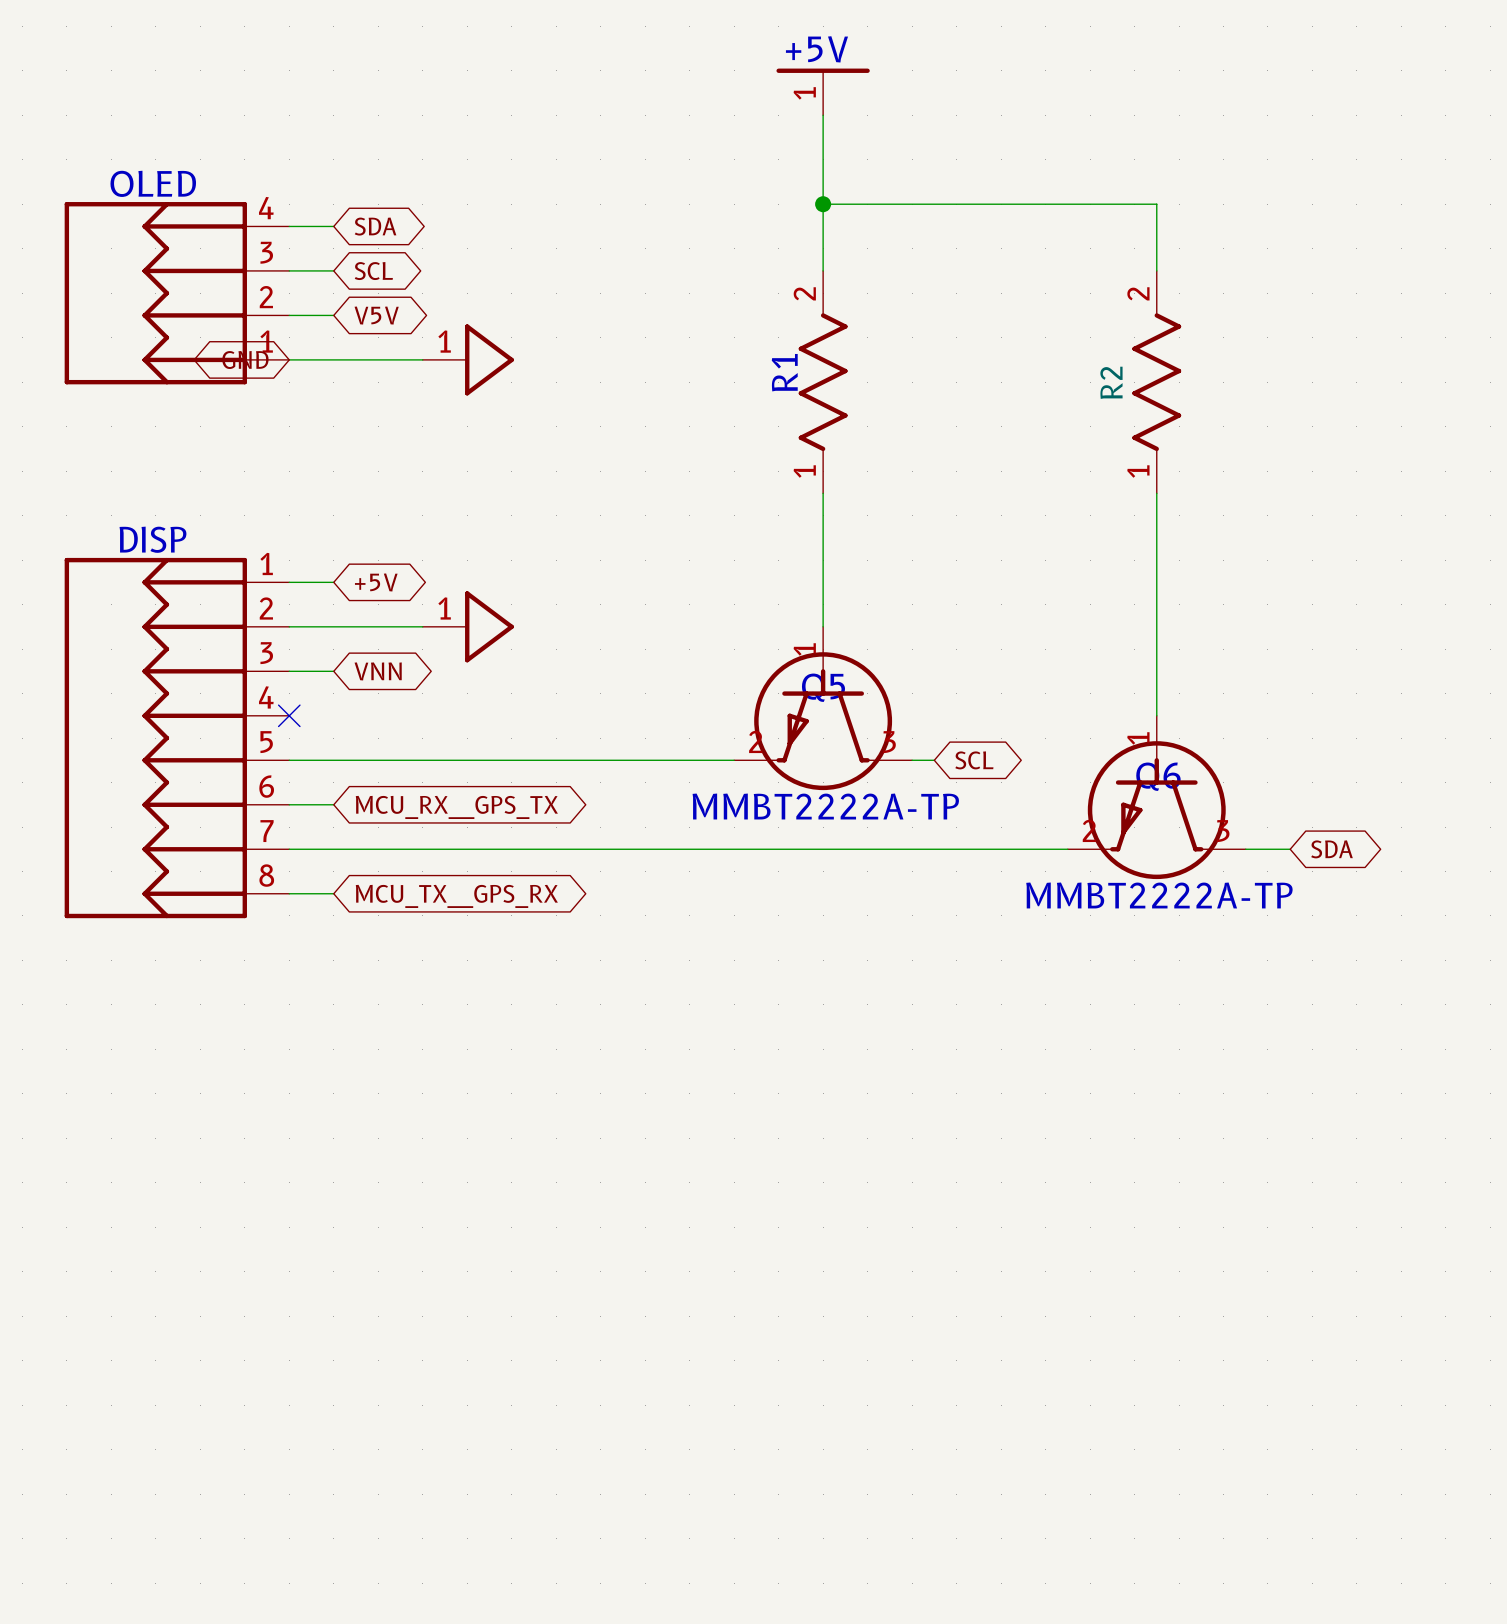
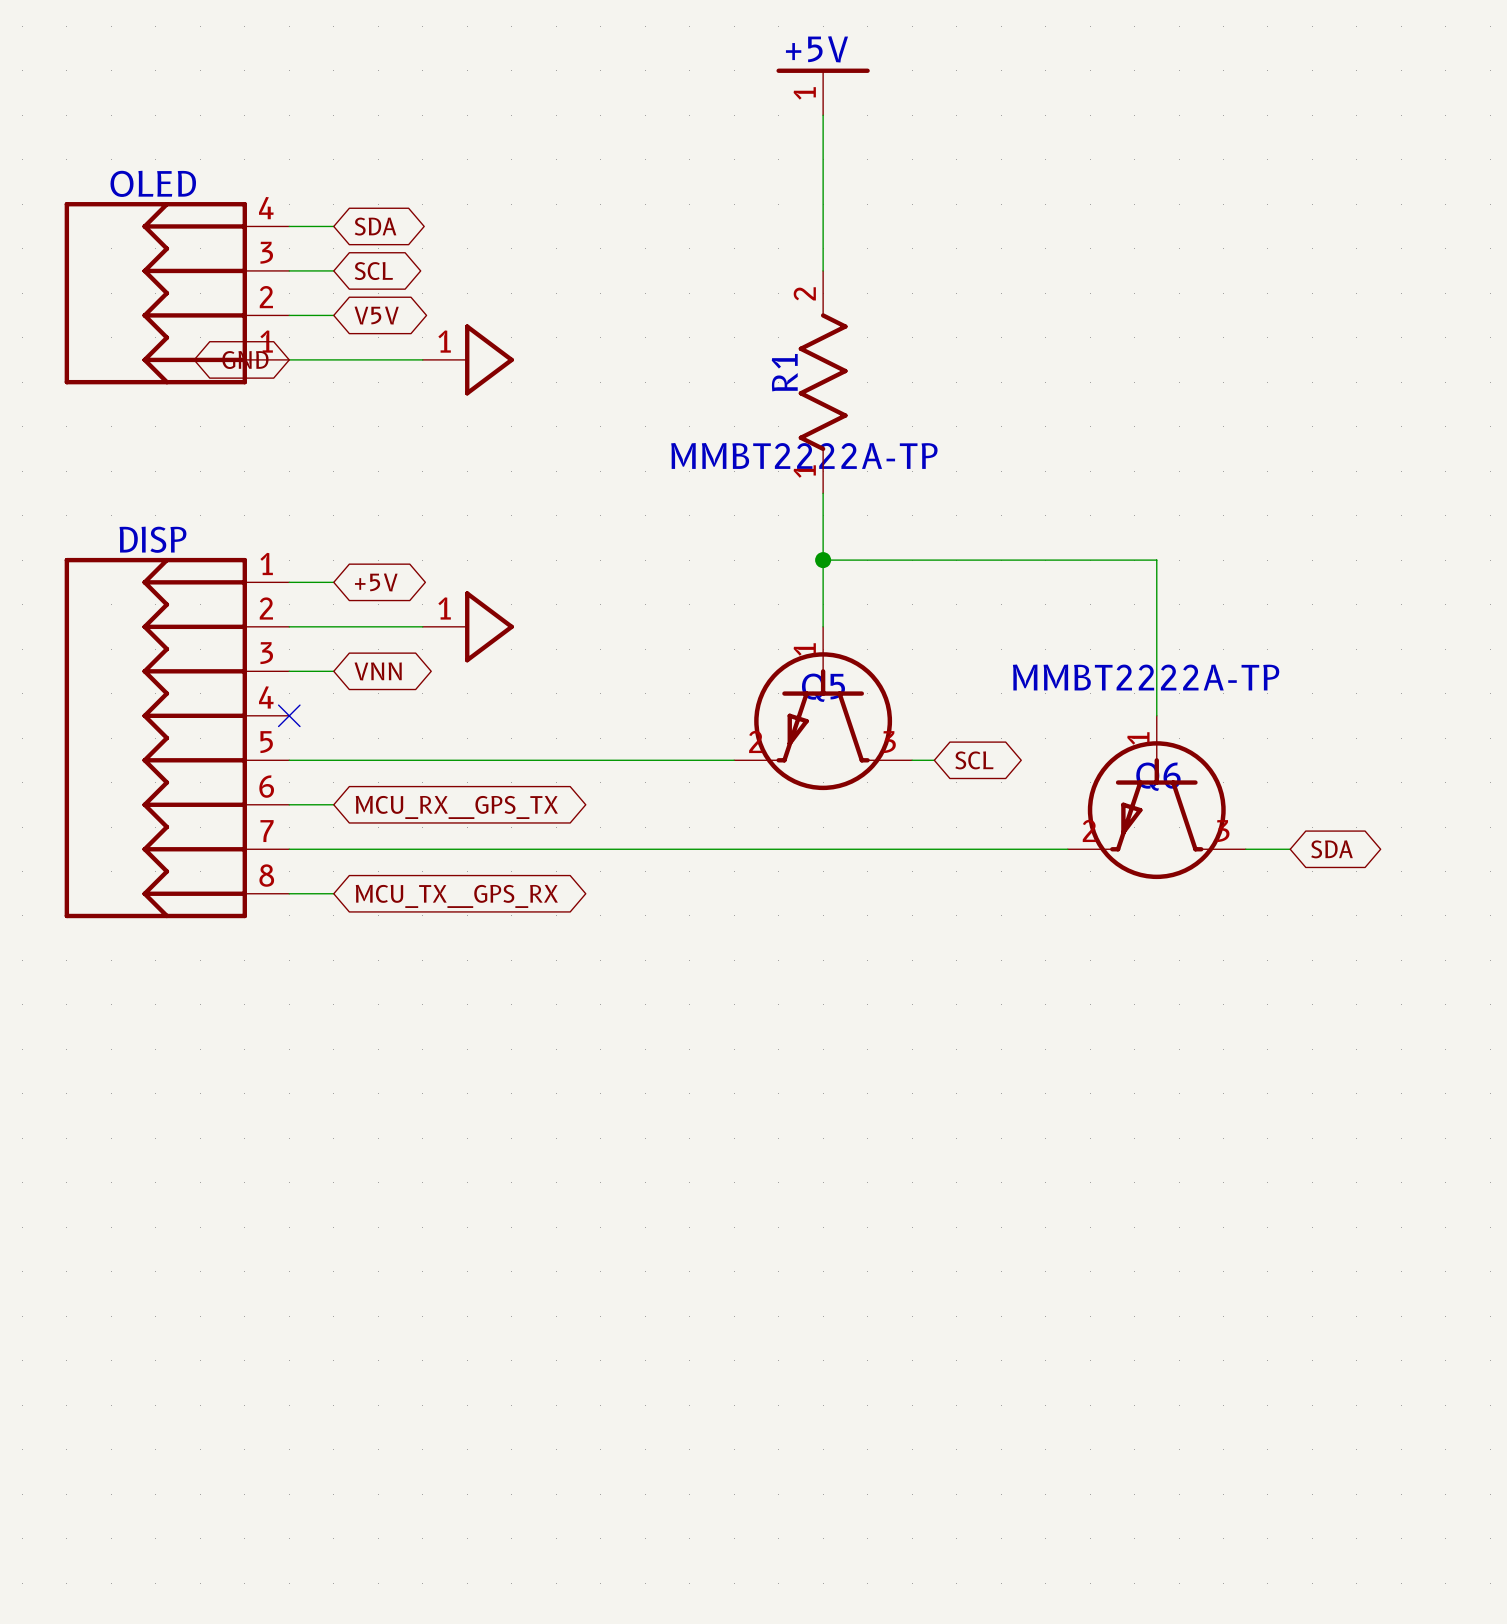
wire: (823, 204) (1156, 204) (1156, 270) -> none
junction: (823, 204) -> none
R2: (1156, 382) -> none
text: none -> MMBT2222A-TP (804, 455)
wire: (1156, 493) (1156, 560) -> (823, 560) (1156, 560)
junction: none -> (823, 560)
text: none -> MMBT2222A-TP (1146, 677)
text: MMBT2222A-TP (825, 806) -> none
text: MMBT2222A-TP (1159, 895) -> none

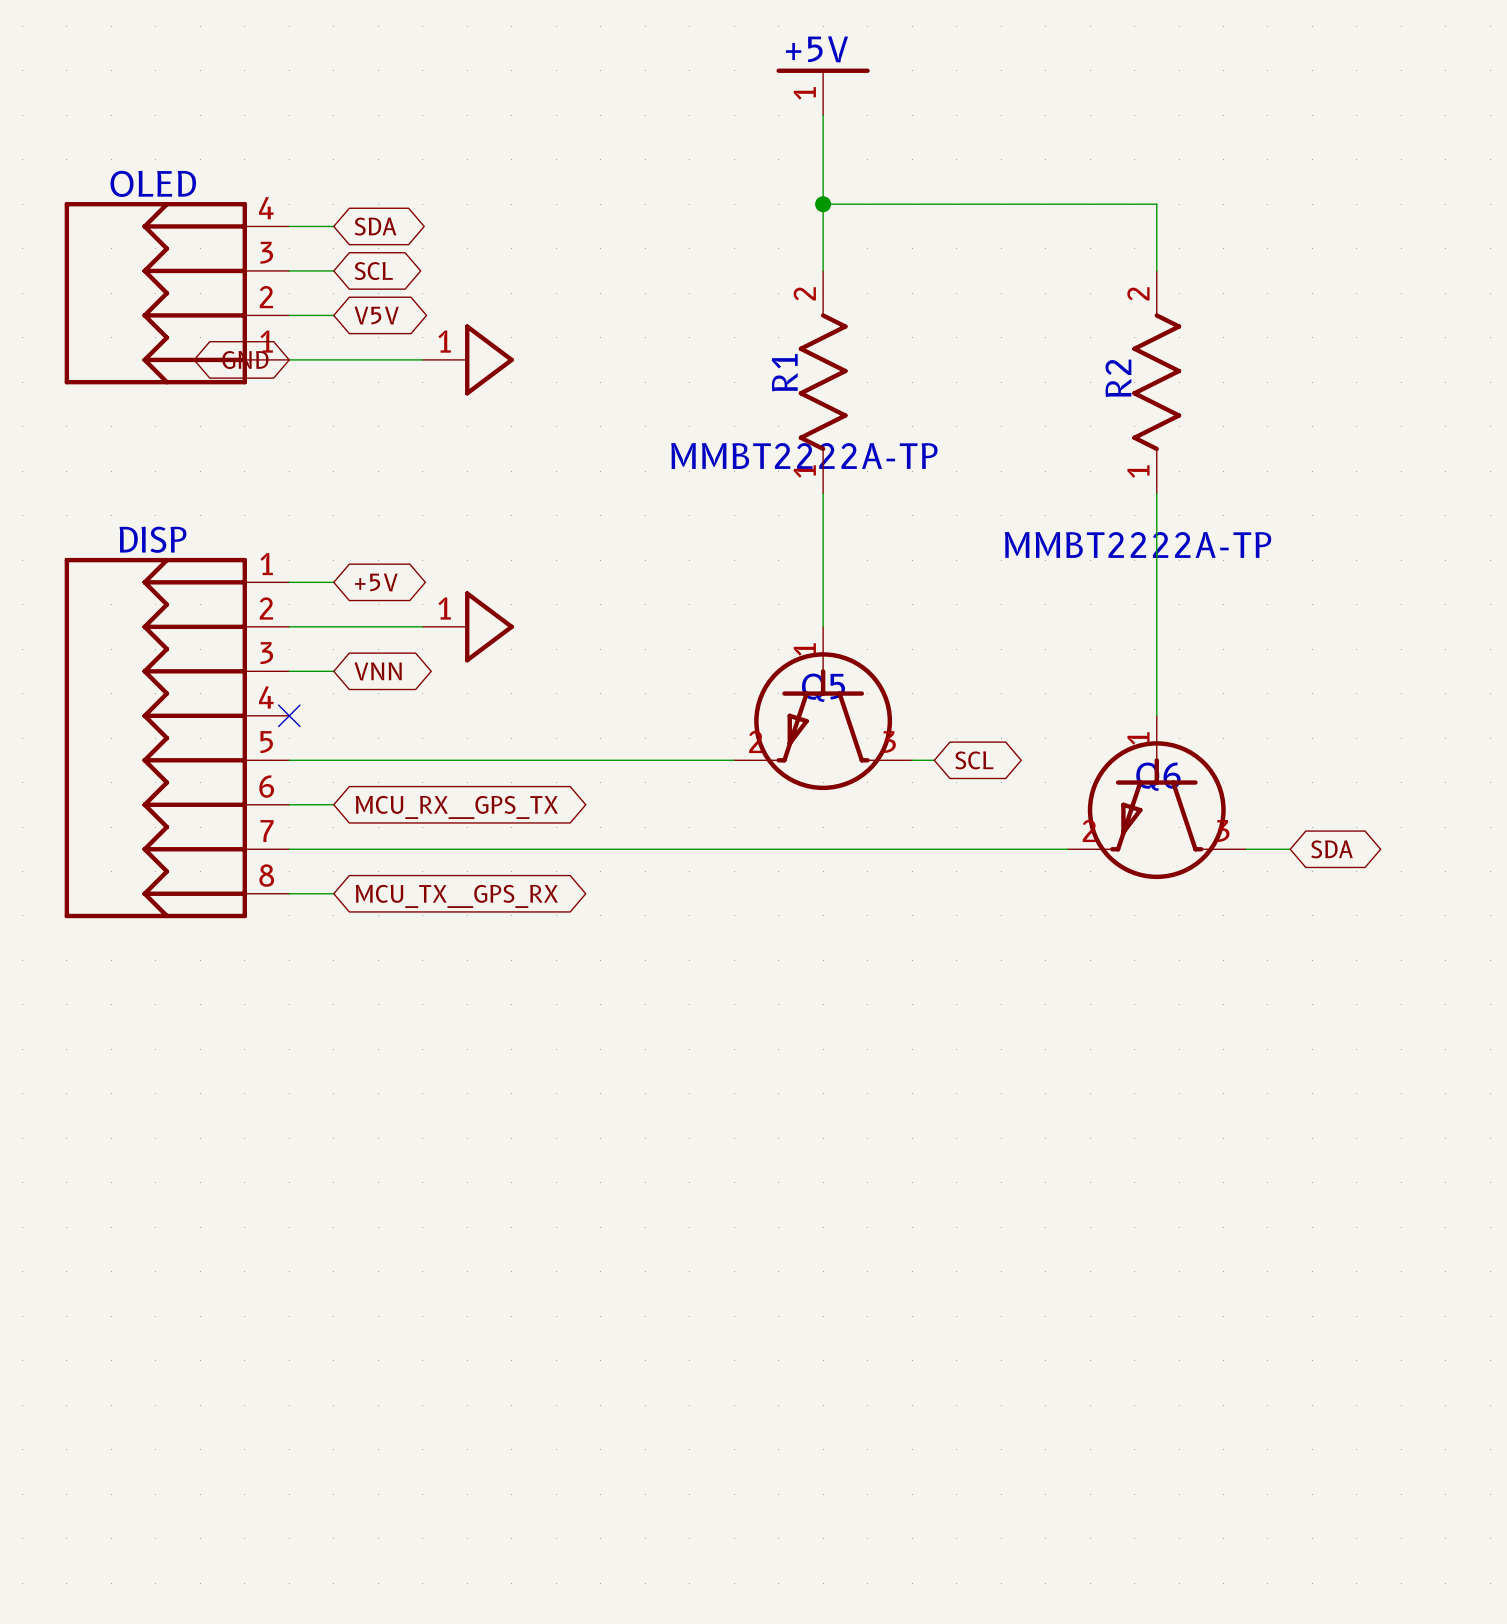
wire: none -> (823, 204) (1156, 204) (1156, 270)
junction: none -> (823, 204)
text: none -> R2 (1118, 378)
part: none -> (1156, 382)
wire: (823, 560) (1156, 560) -> (1156, 493) (1156, 560)
junction: (823, 560) -> none
text position: MMBT2222A-TP (1146, 677) -> MMBT2222A-TP (1138, 544)

